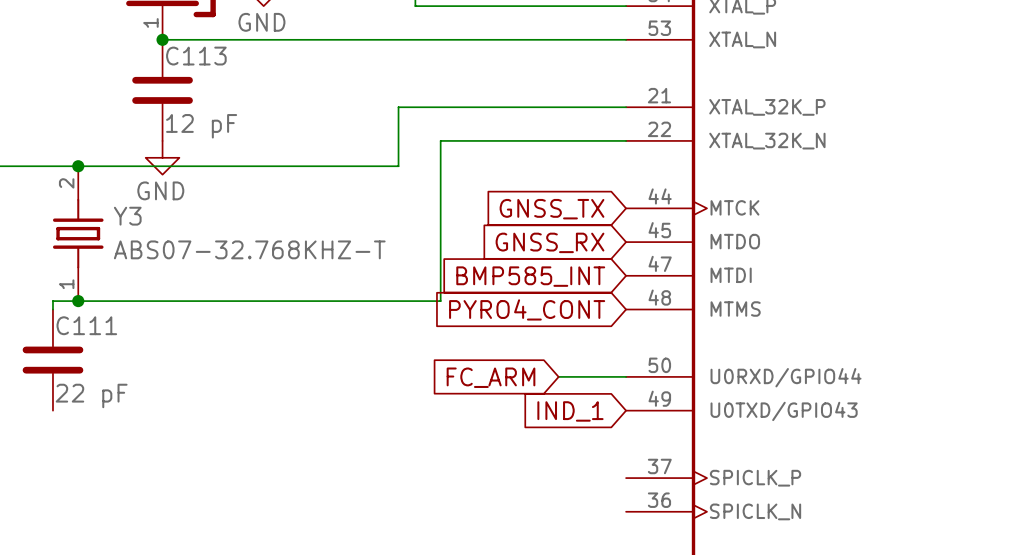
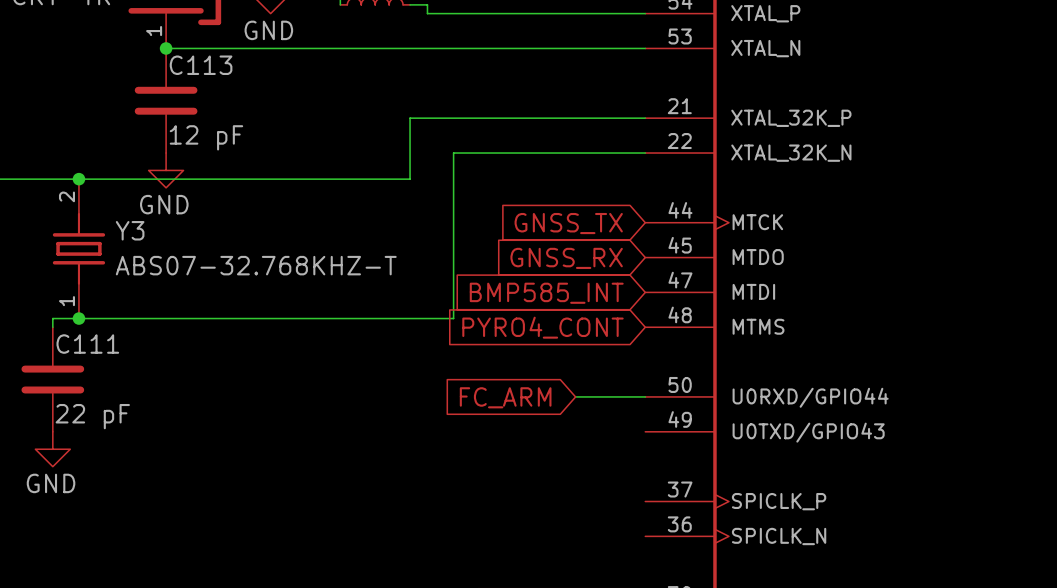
global label: IND_1 (570, 411) -> none
power symbol: none -> GND (52, 449)

